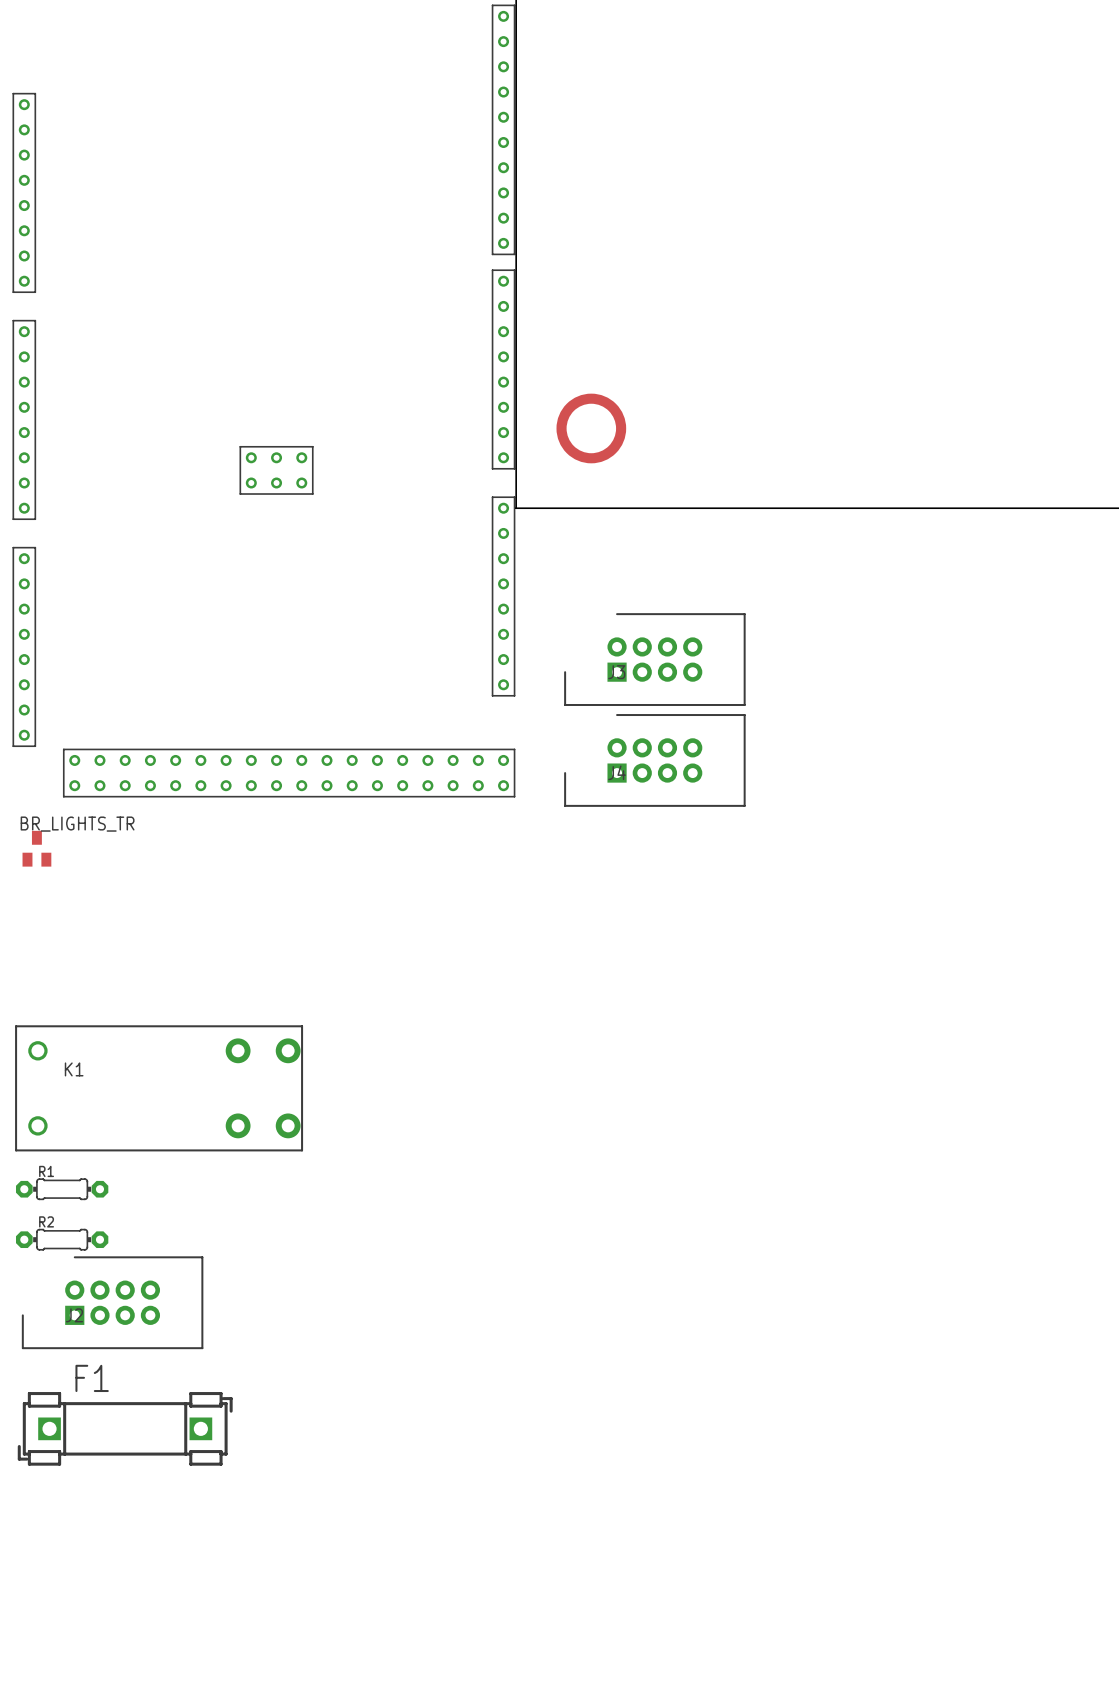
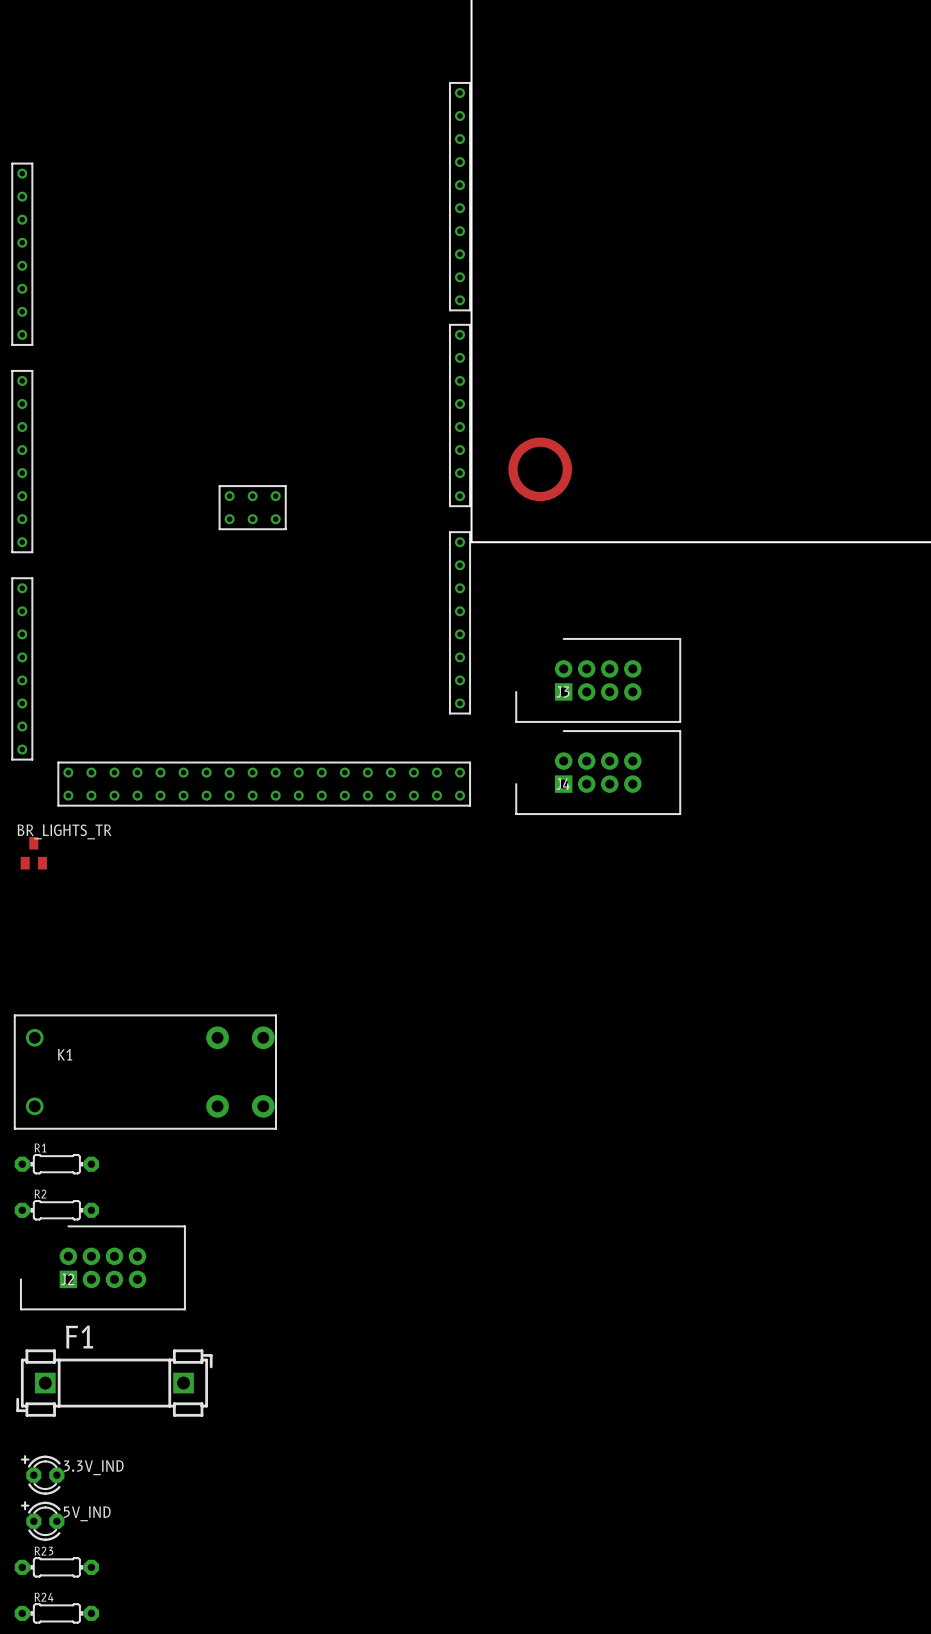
3.3V_IND: none -> (42, 1475)
5V_IND: none -> (42, 1521)
R23: none -> (56, 1567)
R24: none -> (56, 1613)

